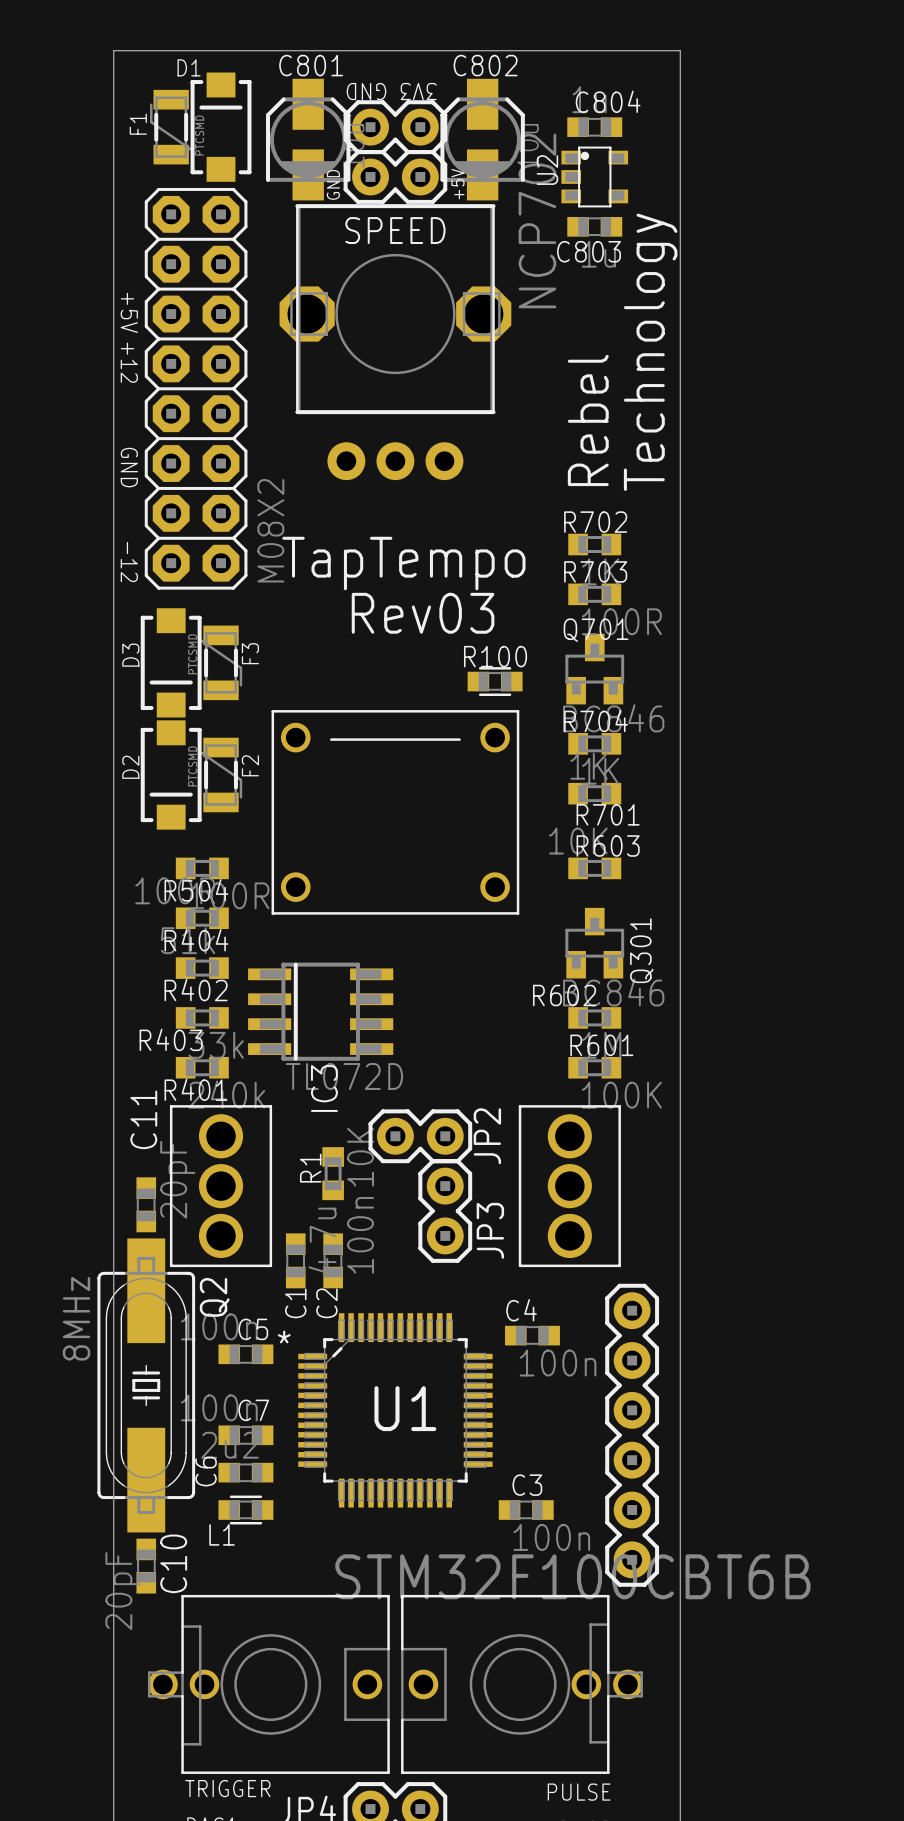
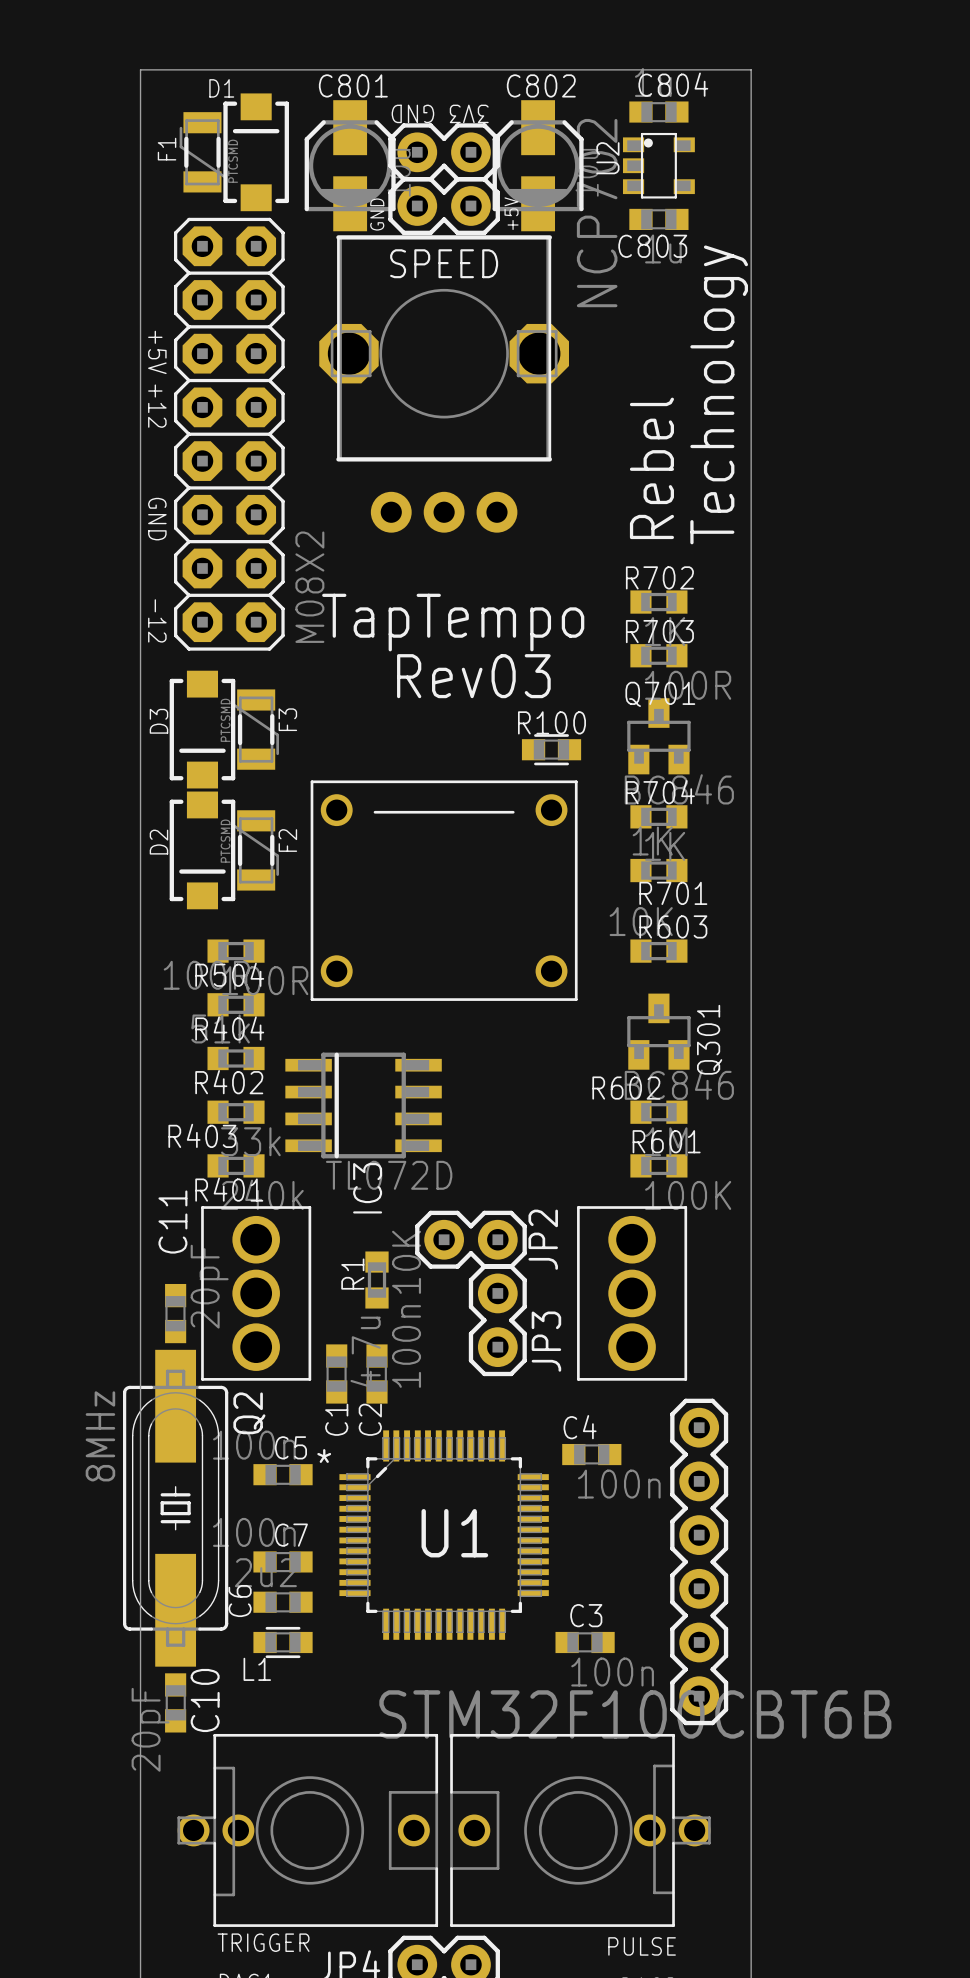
C804 position: (594, 127) -> (658, 112)
U2 position: (594, 176) -> (658, 165)
C803 position: (594, 226) -> (658, 219)

